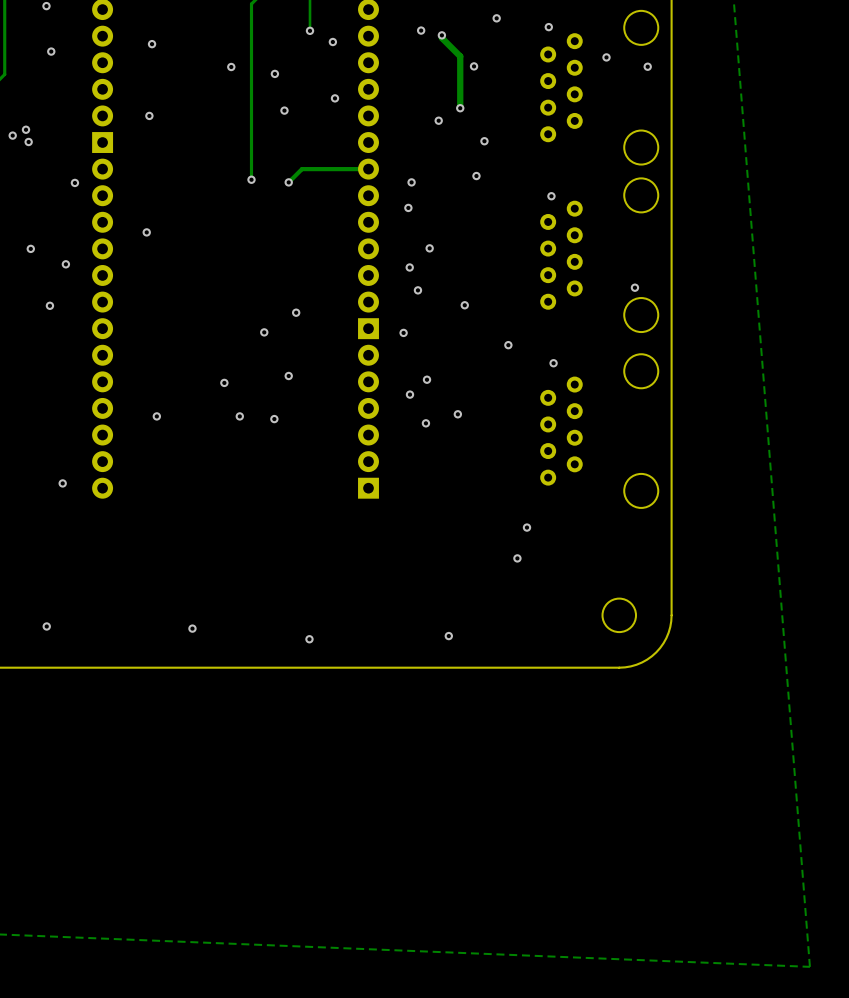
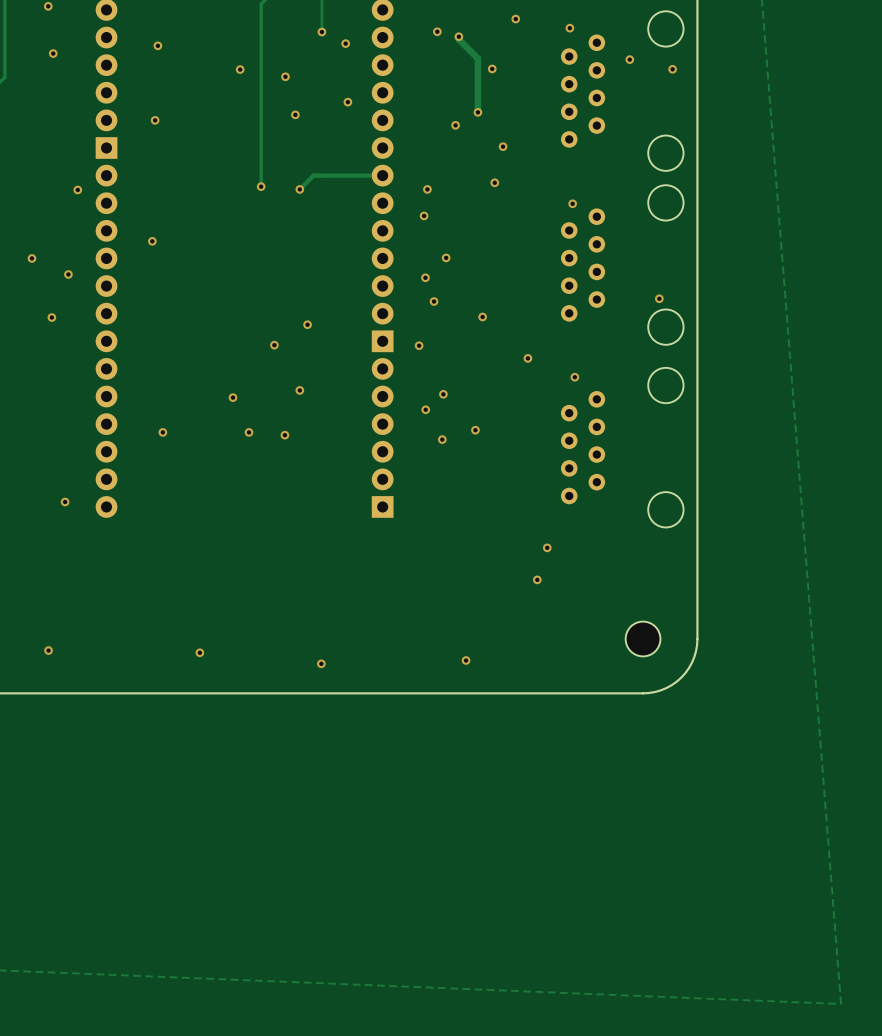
via: (26, 129) -> none
via: (12, 135) -> none
via: (28, 141) -> none

